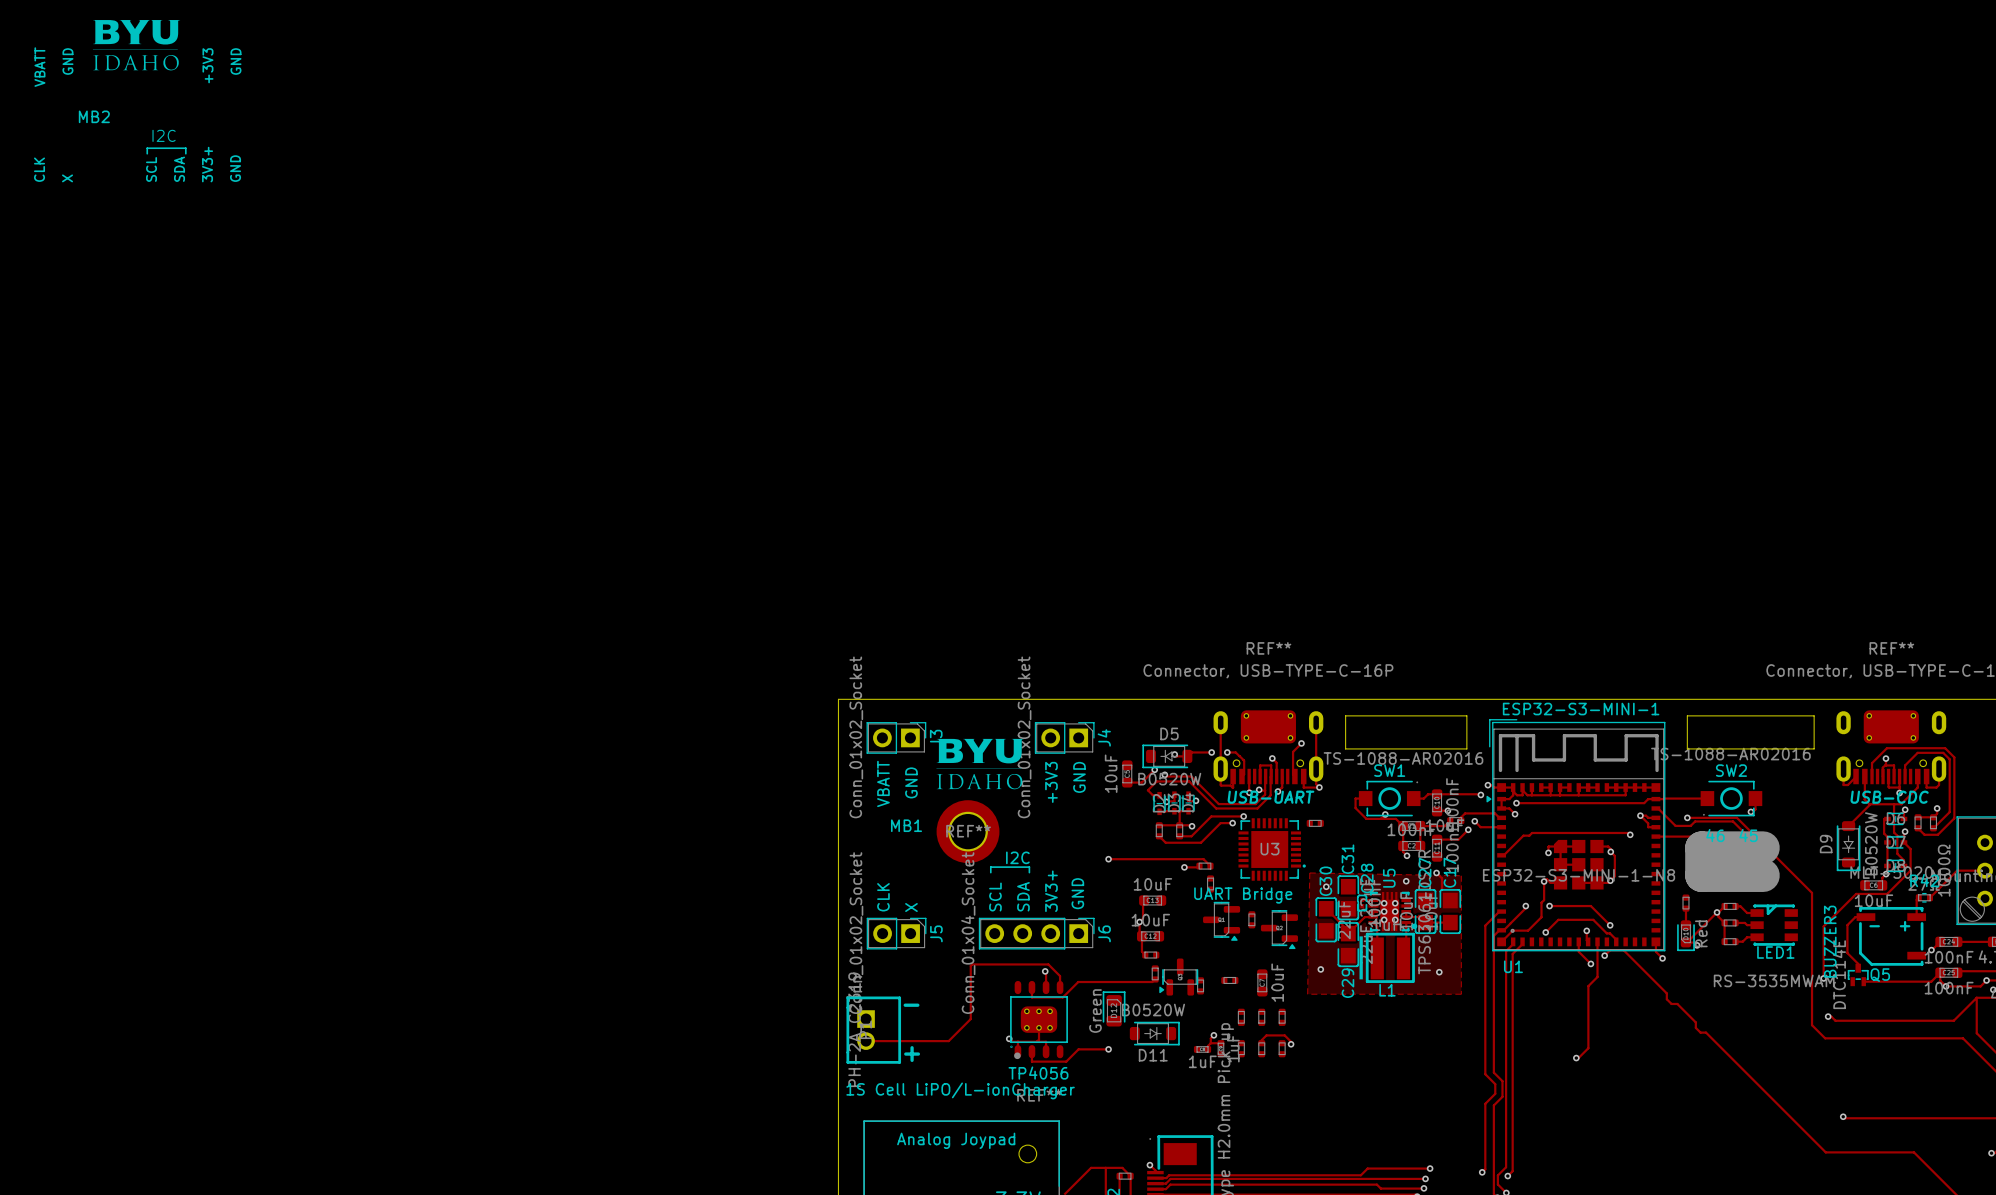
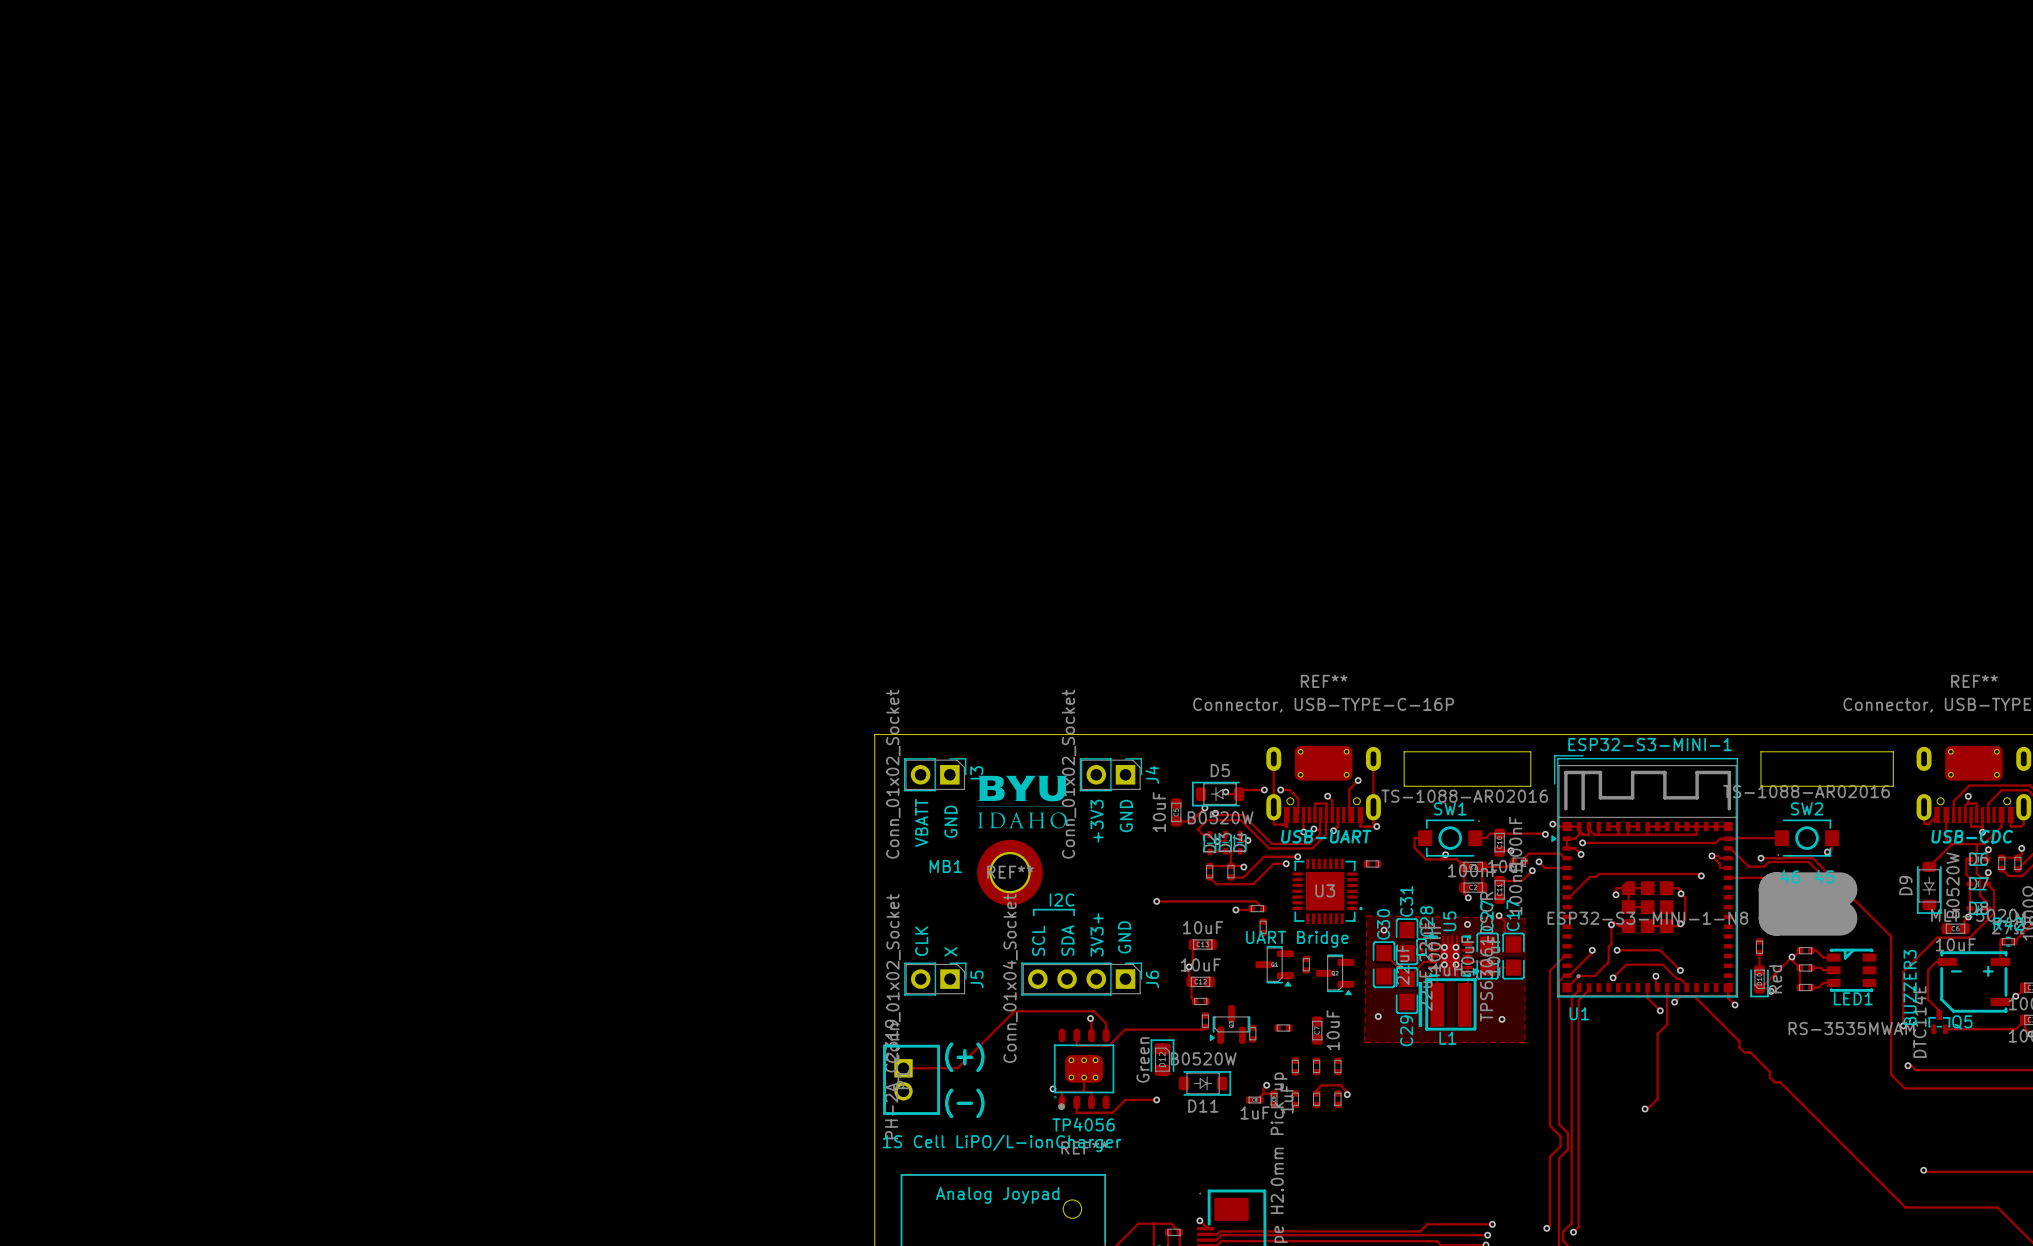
MB2: (139, 87) -> none
track: (972, 964) (970, 1019) (948, 1041) (866, 1041) -> (1014, 1011) (957, 1068) (903, 1068)
text: - (911, 1005) -> (+) (964, 1057)
text: + (912, 1054) -> (-) (964, 1103)

